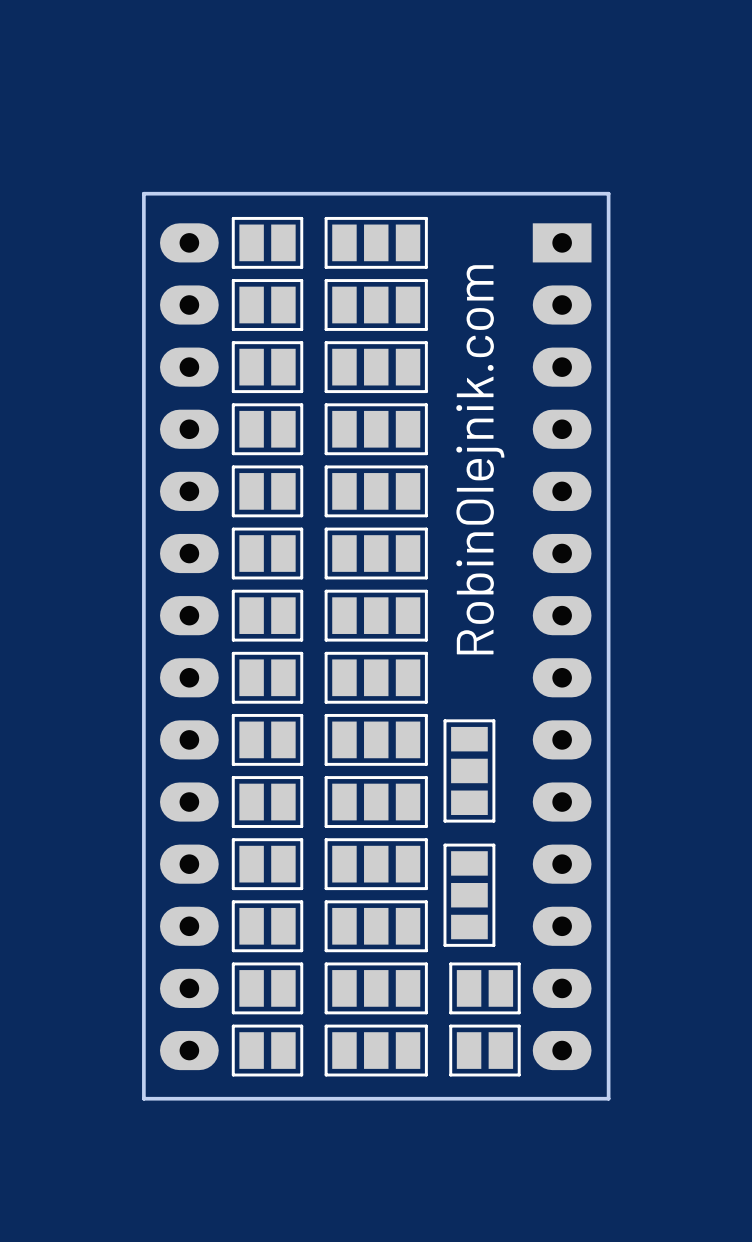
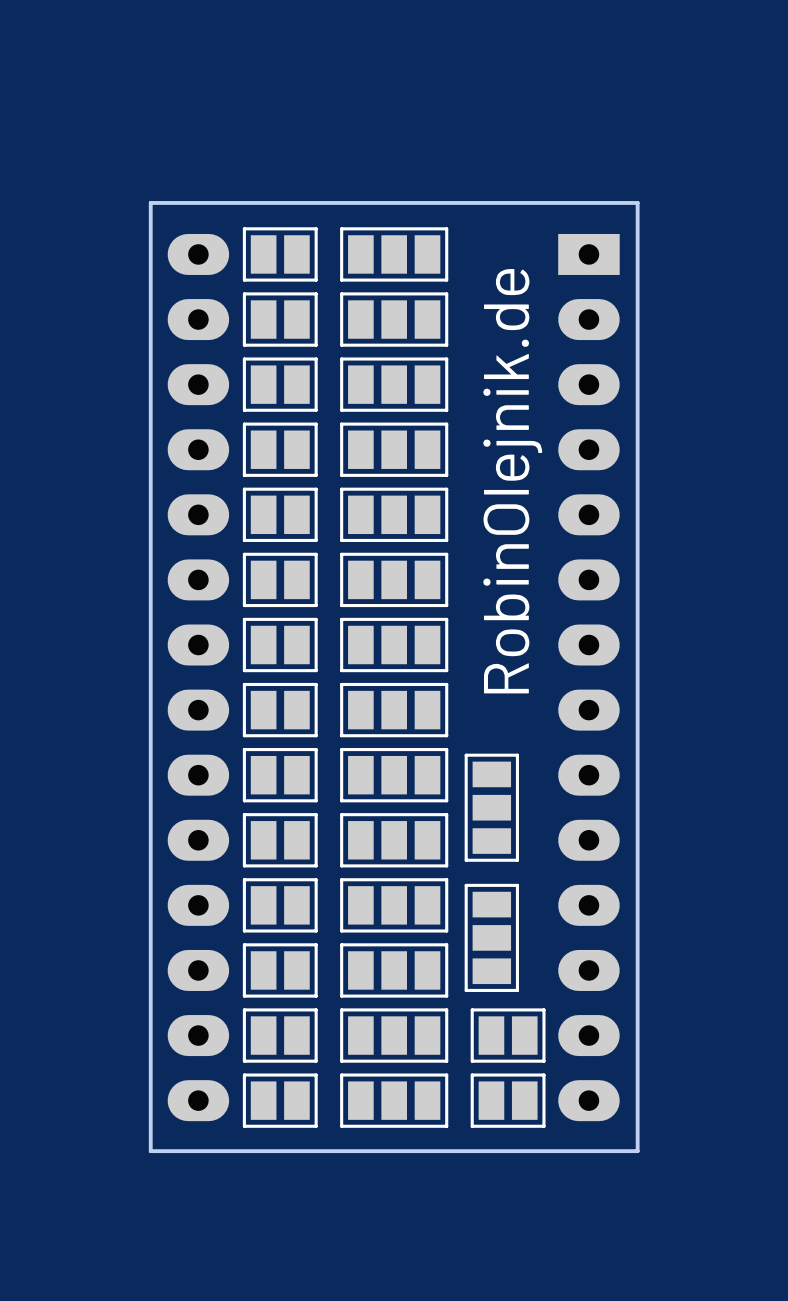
text: RobinOlejnik.com (480, 459) -> RobinOlejnik.de (512, 481)

